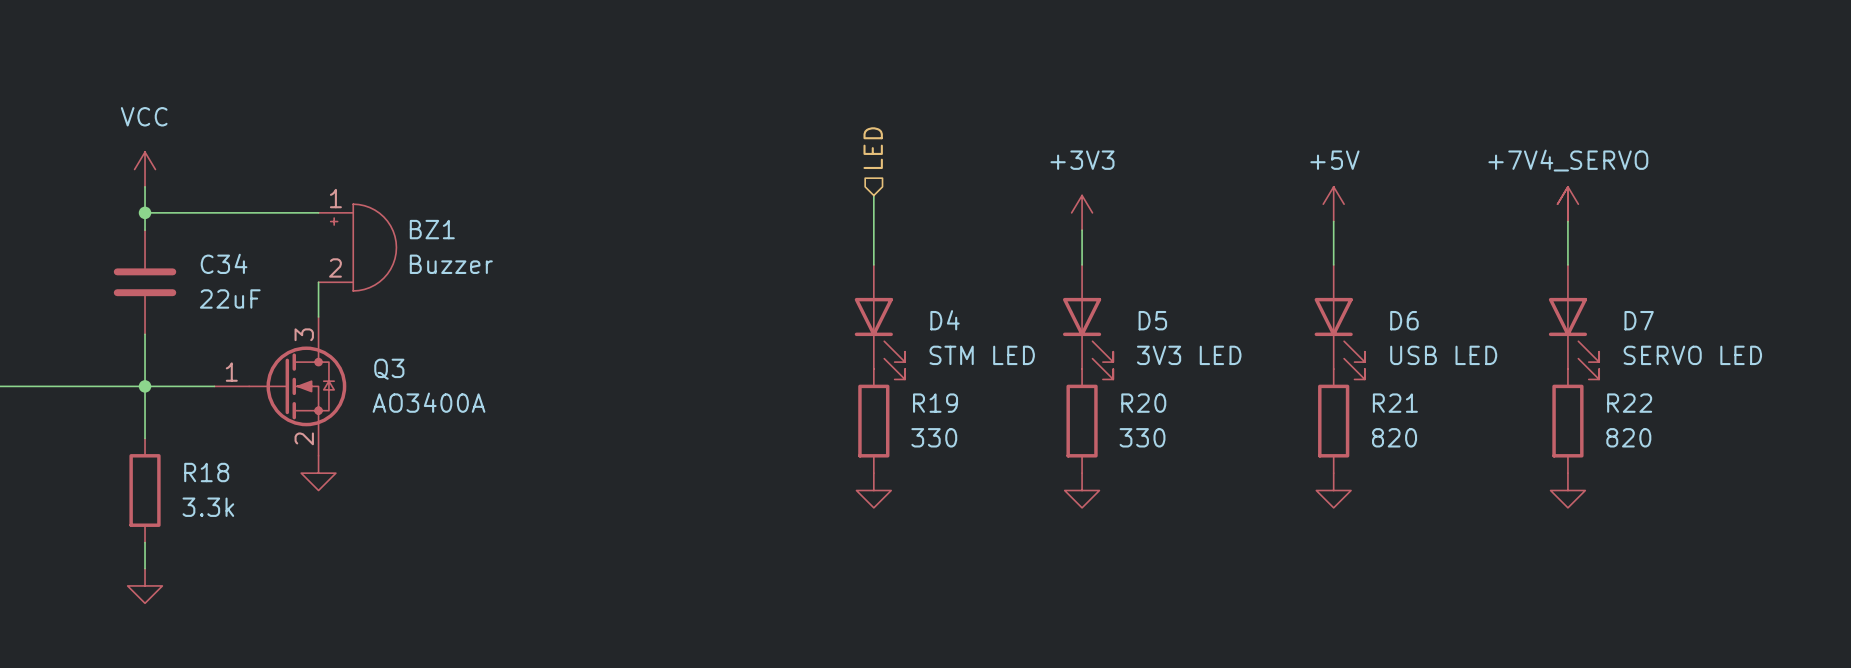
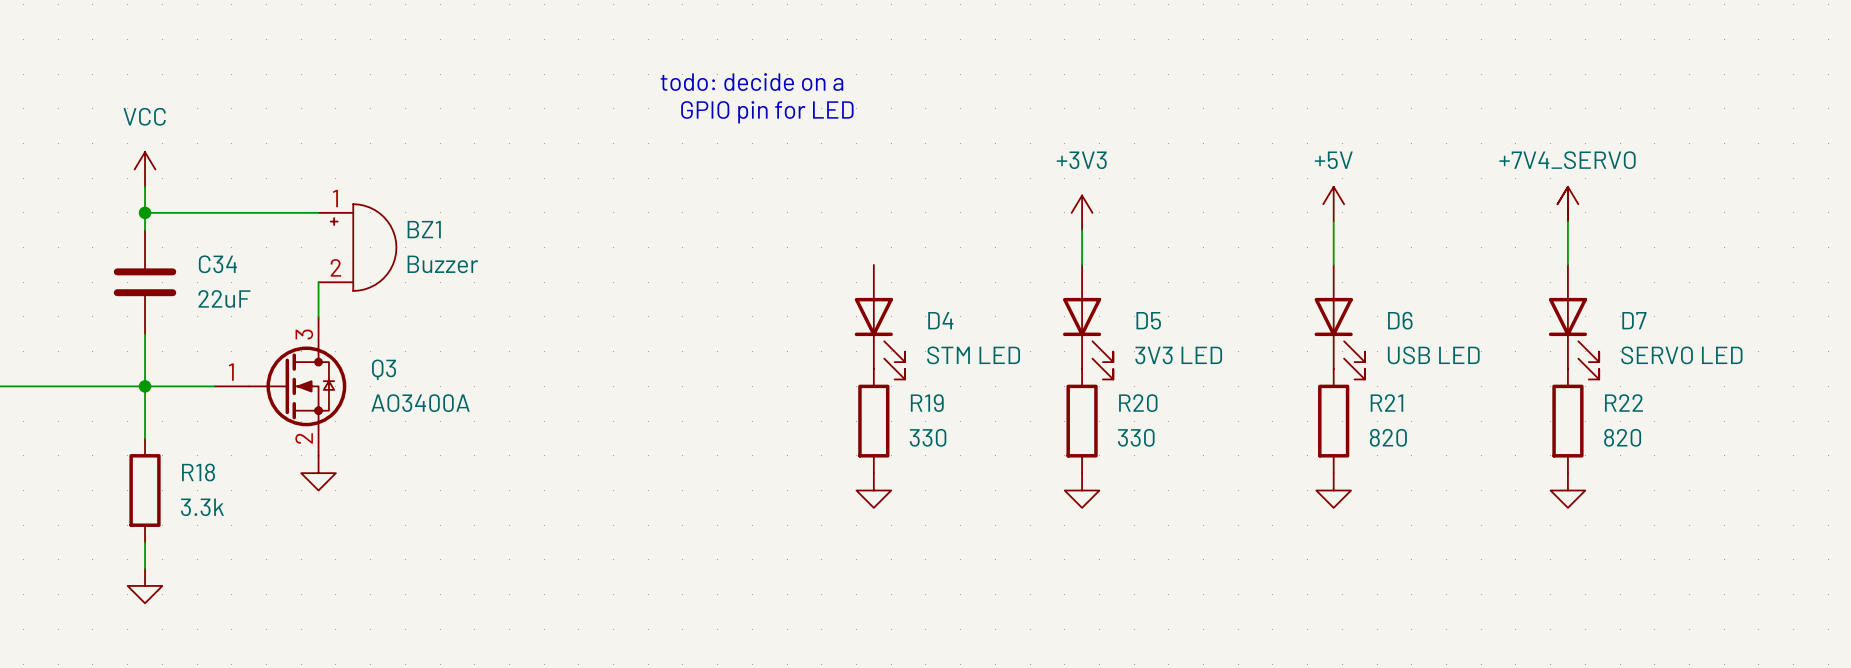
text: none -> todo: decide on a (751, 82)
text: none -> GPIO pin for LED (767, 112)
hierarchical label: LED (873, 148) -> none
wire: (873, 195) (873, 264) -> none

